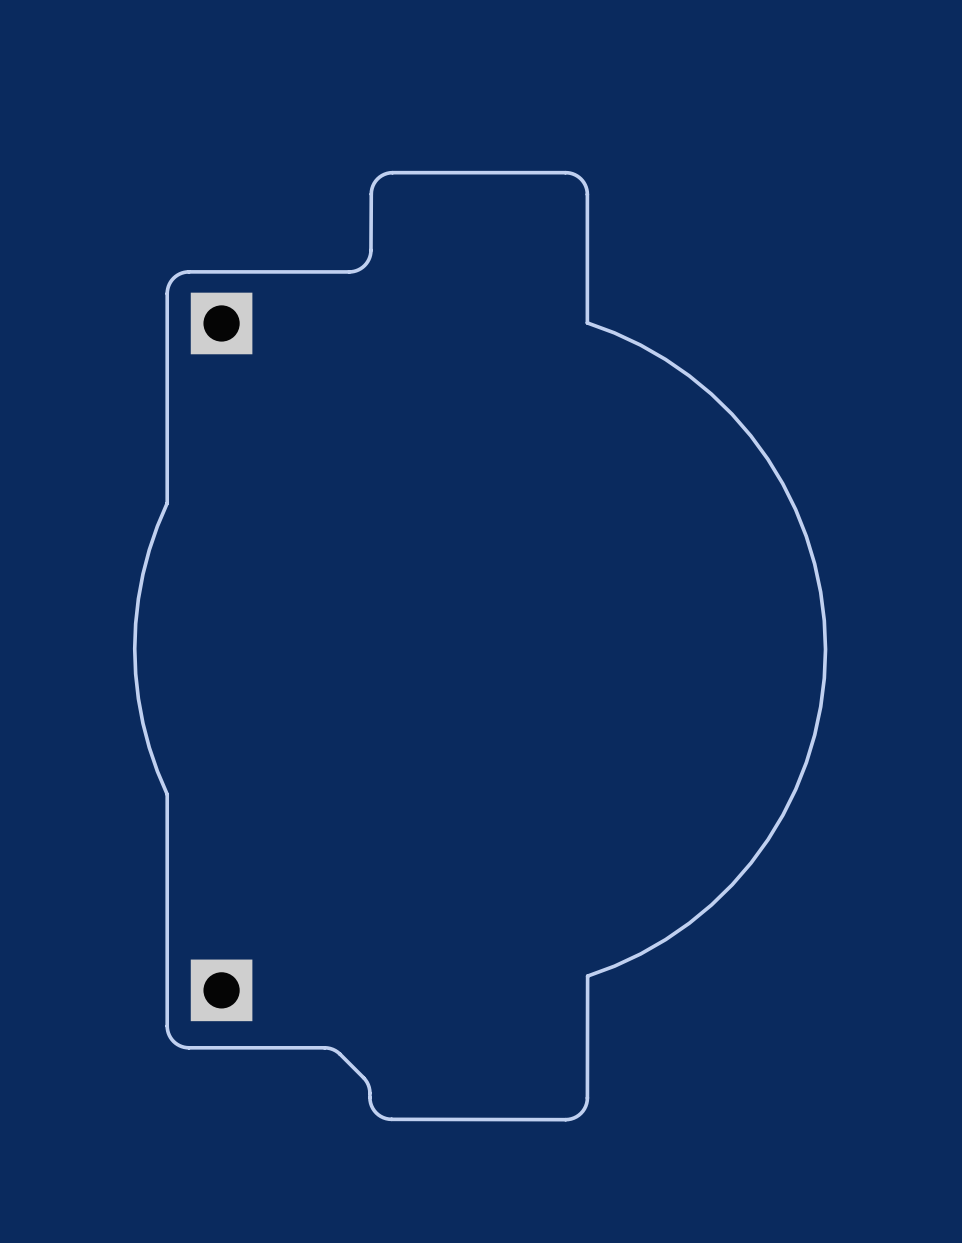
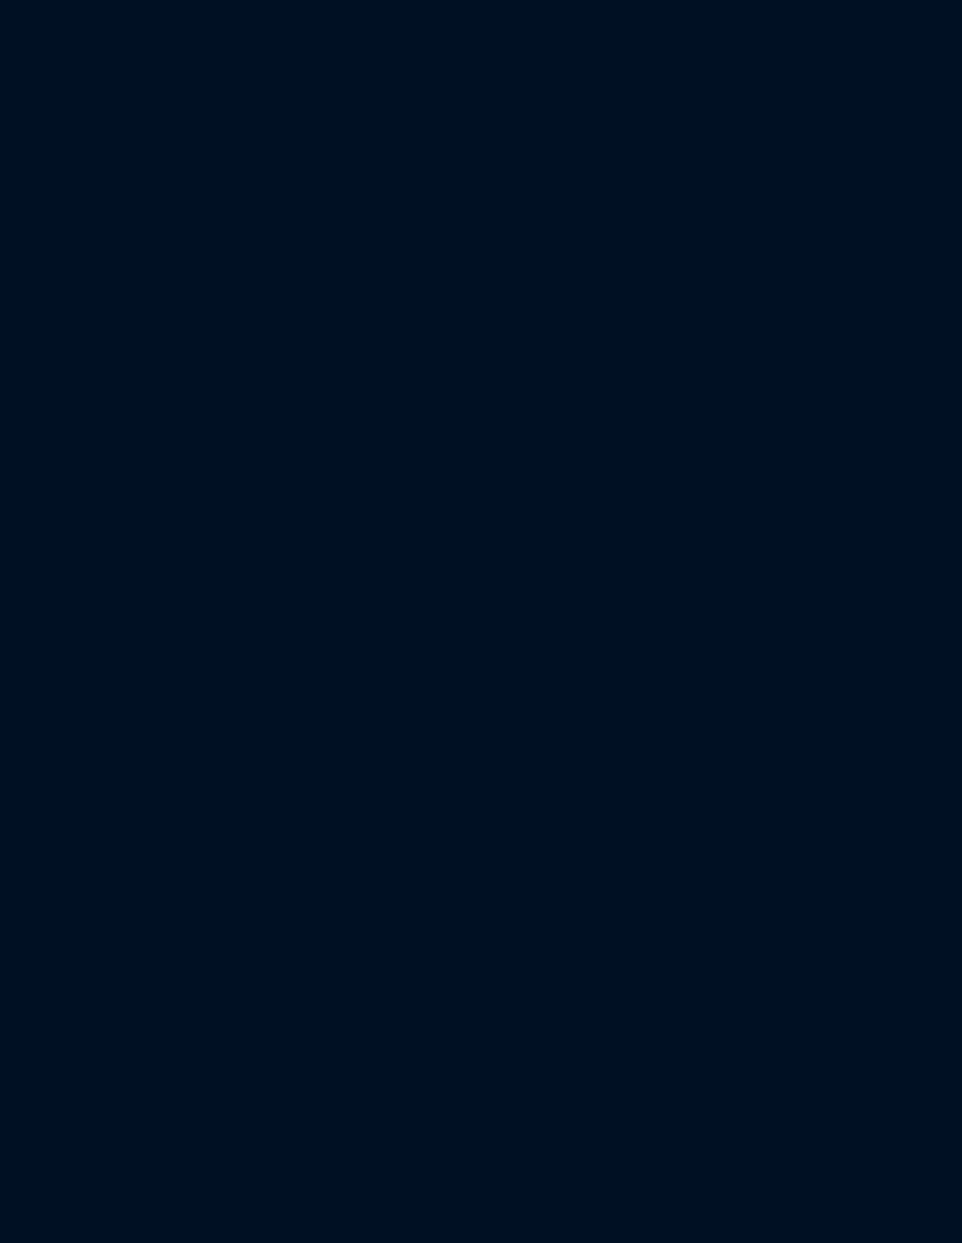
board edge: (392, 172) (565, 172) (572, 173) (580, 178) (585, 184) (587, 194) (587, 322) (640, 345) (665, 359) (689, 375) (732, 414) (767, 459) (782, 483) (806, 536) (820, 592) (825, 649) (820, 706) (806, 762) (795, 789) (768, 839) (732, 884) (711, 904) (689, 923) (640, 953) (587, 976) (587, 1100) (581, 1113) (568, 1119) (386, 1118) (378, 1114) (372, 1108) (369, 1087) (365, 1079) (332, 1049) (324, 1047) (186, 1047) (173, 1041) (167, 1030) (167, 794) (157, 771) (142, 723) (135, 673) (134, 648) (138, 598) (142, 574) (157, 526) (167, 503) (167, 288) (173, 278) (186, 272) (349, 271) (358, 269) (366, 263) (370, 255) (372, 185) (381, 175) (392, 172) -> none
part: (221, 323) -> none
part: (221, 990) -> none

